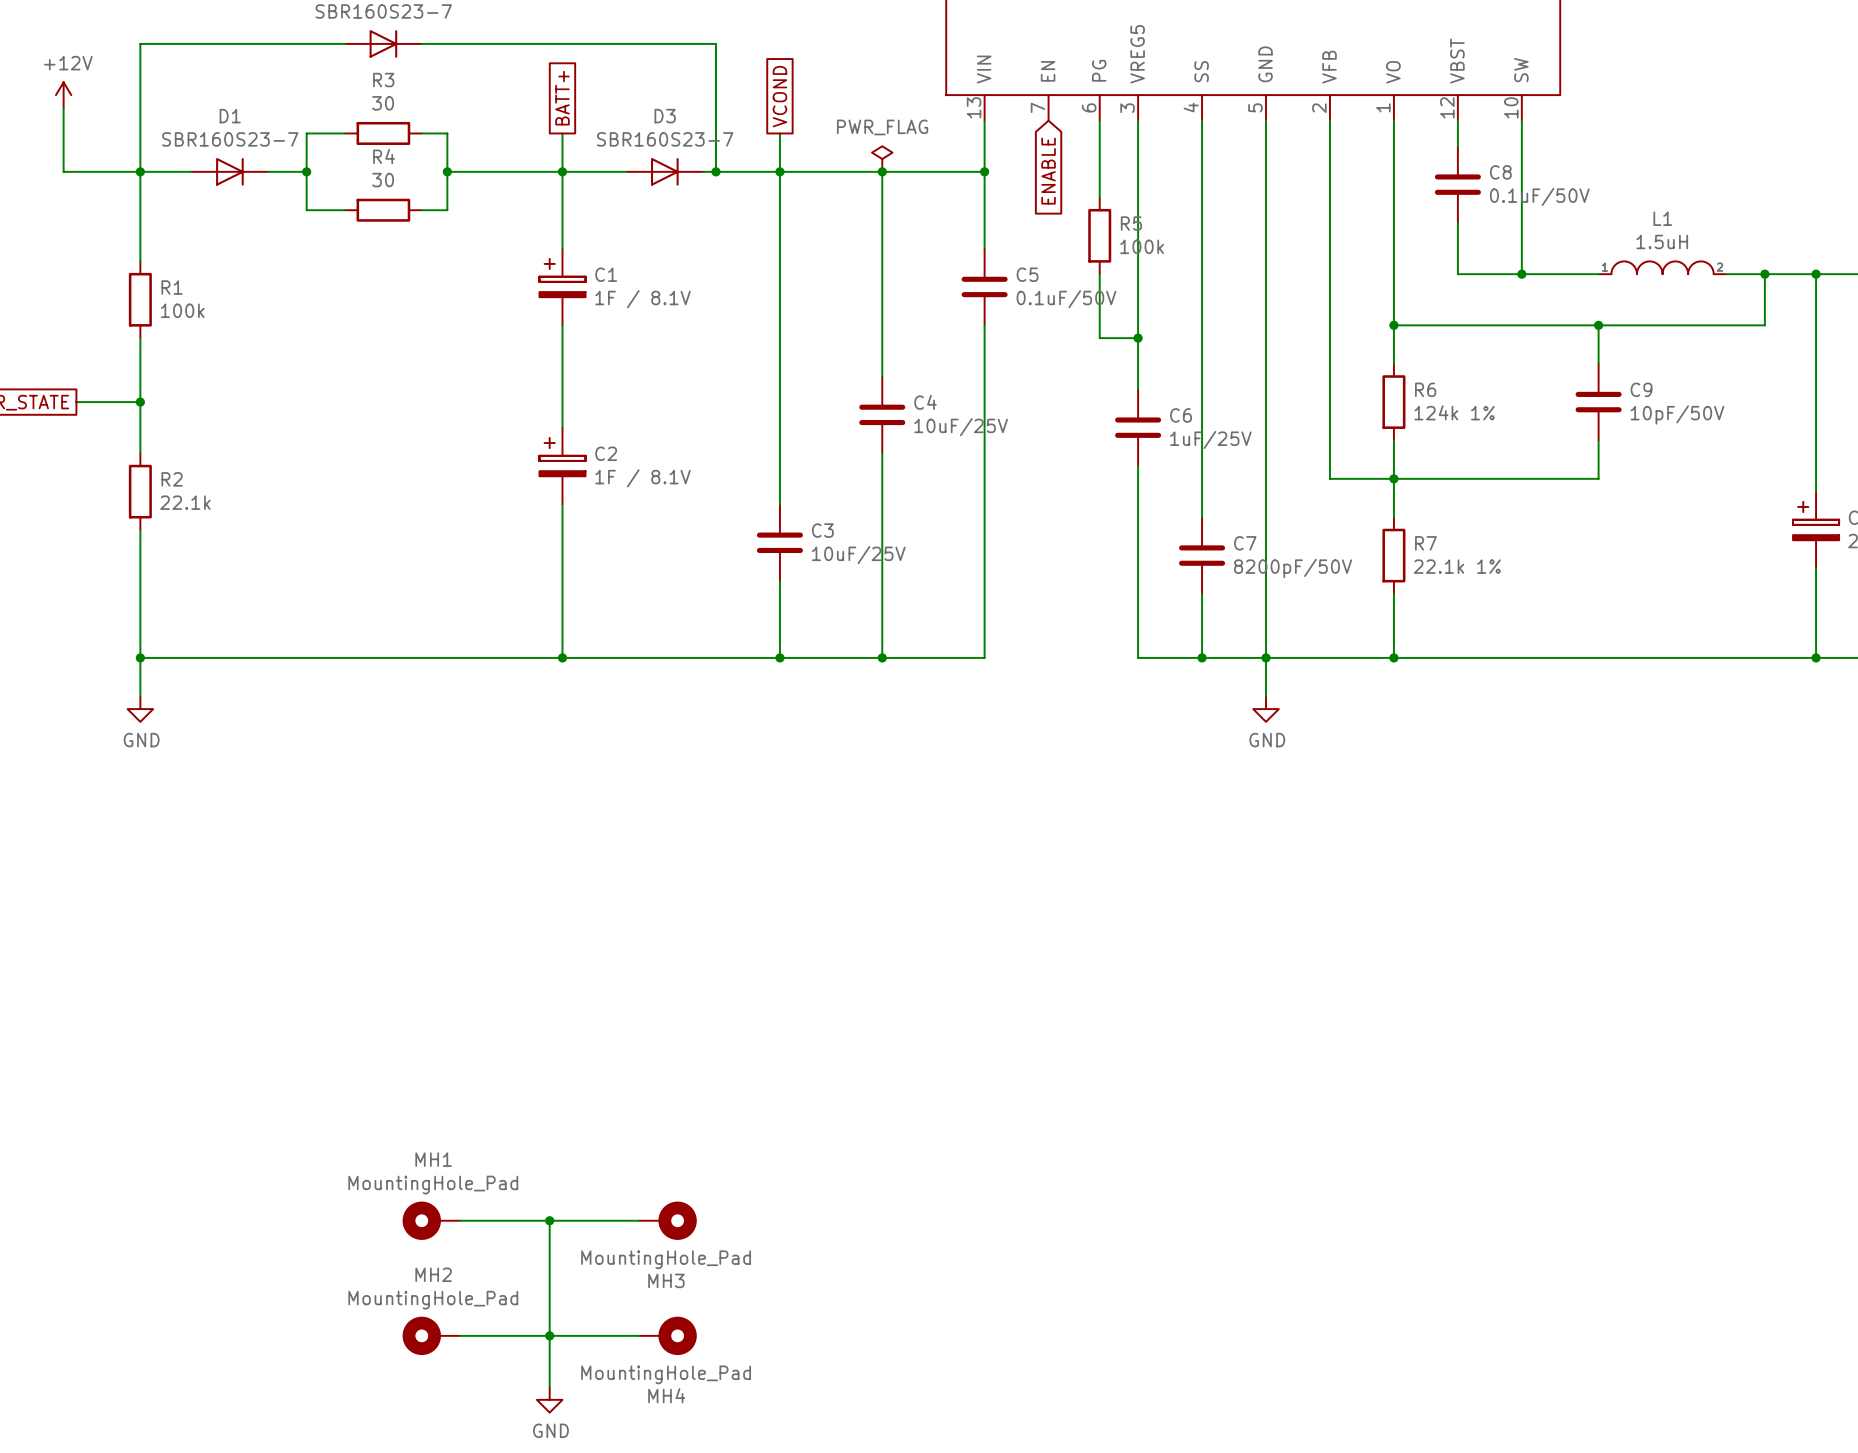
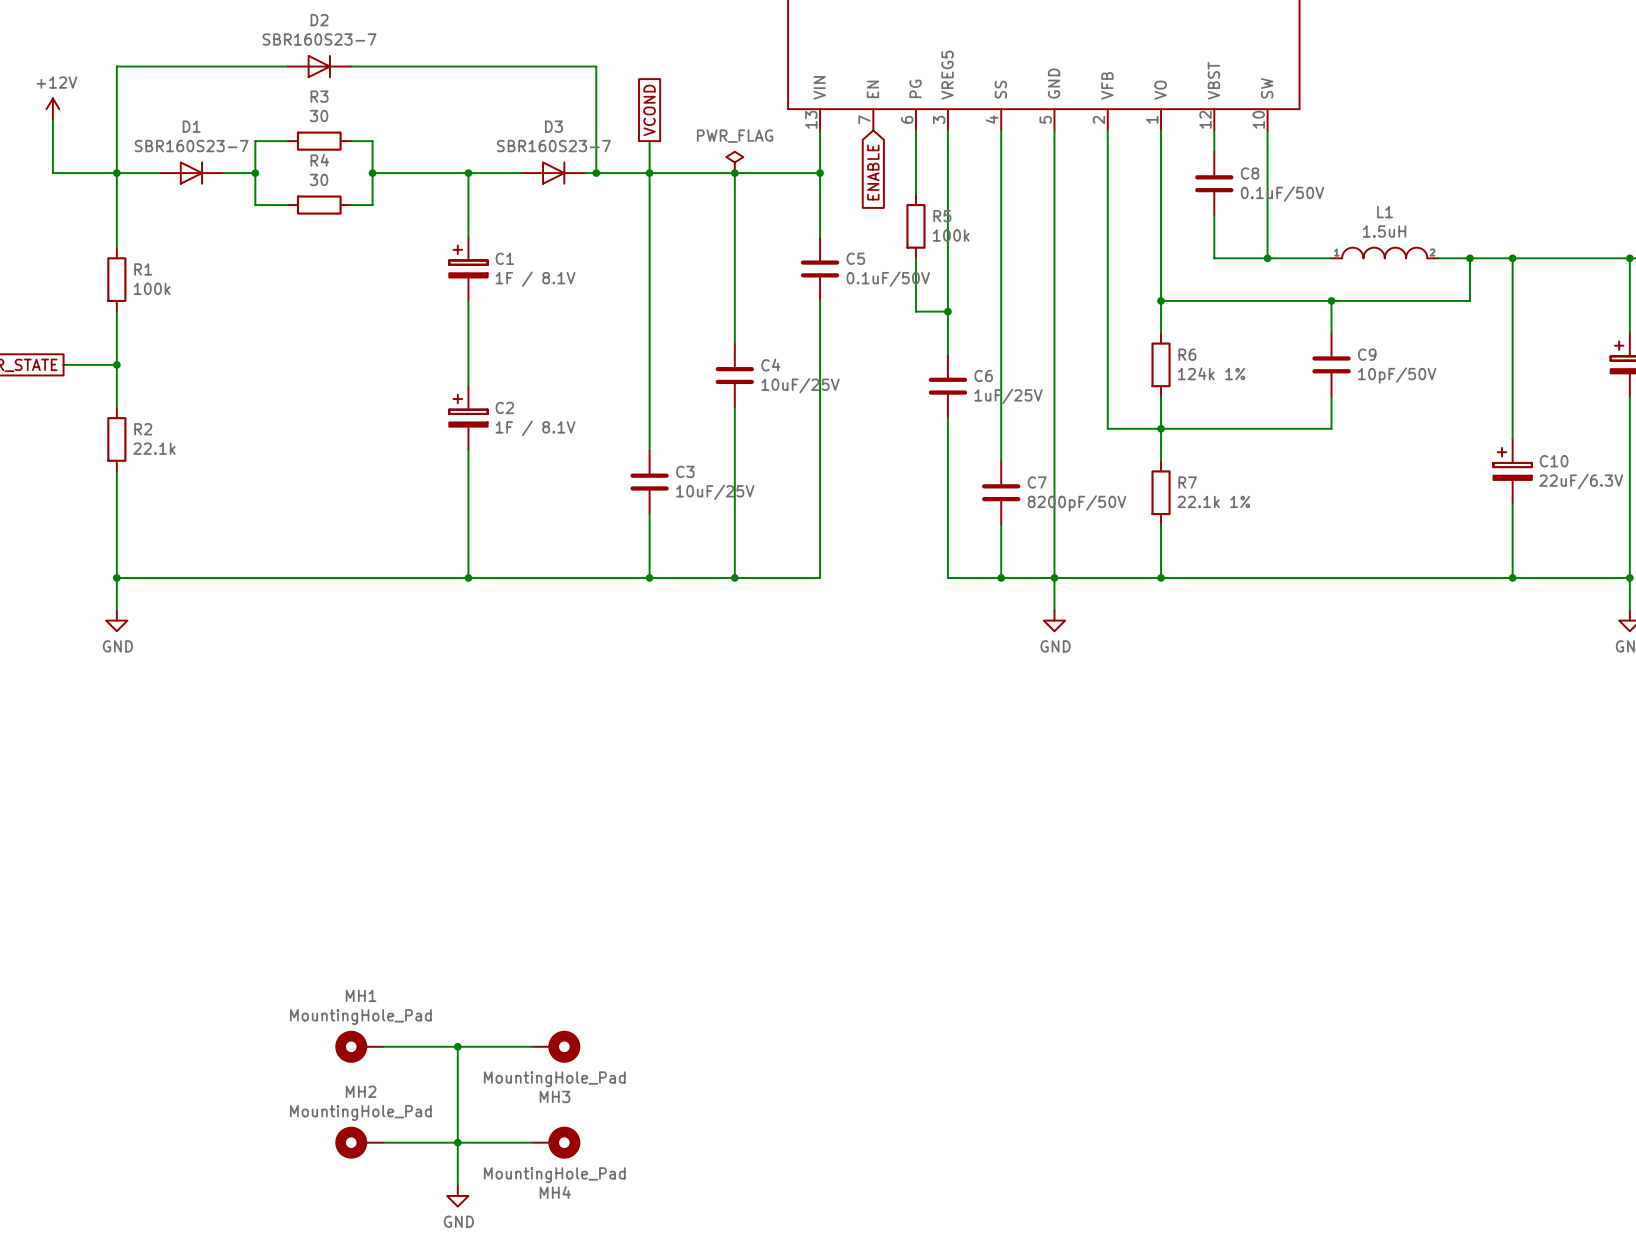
global label: BATT+ (562, 98) -> none
wire: (562, 133) (562, 171) -> none

